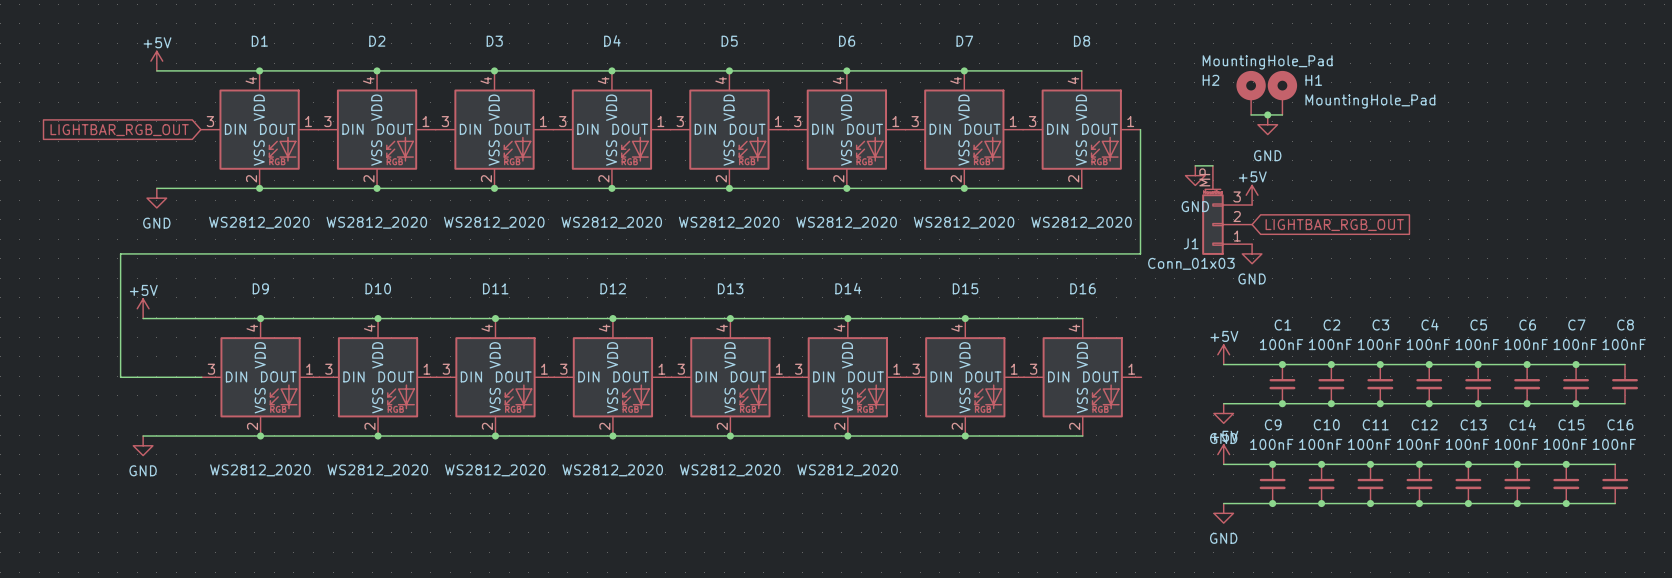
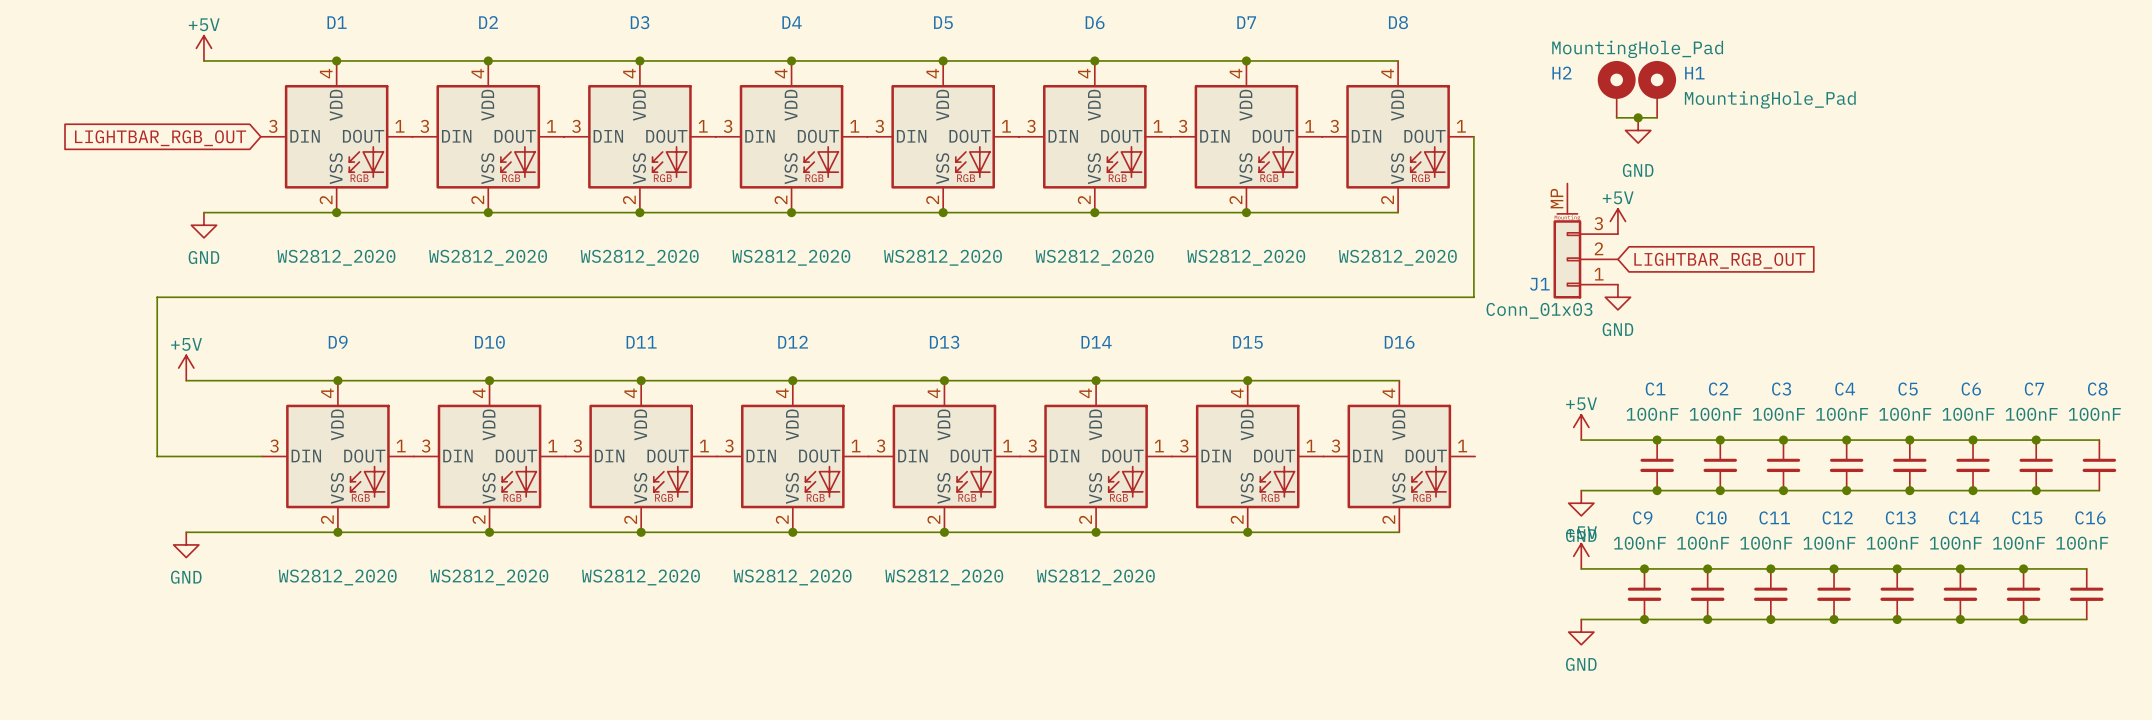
wire: (1195, 165) (1212, 165) -> none
power symbol: GND (1195, 175) -> none

